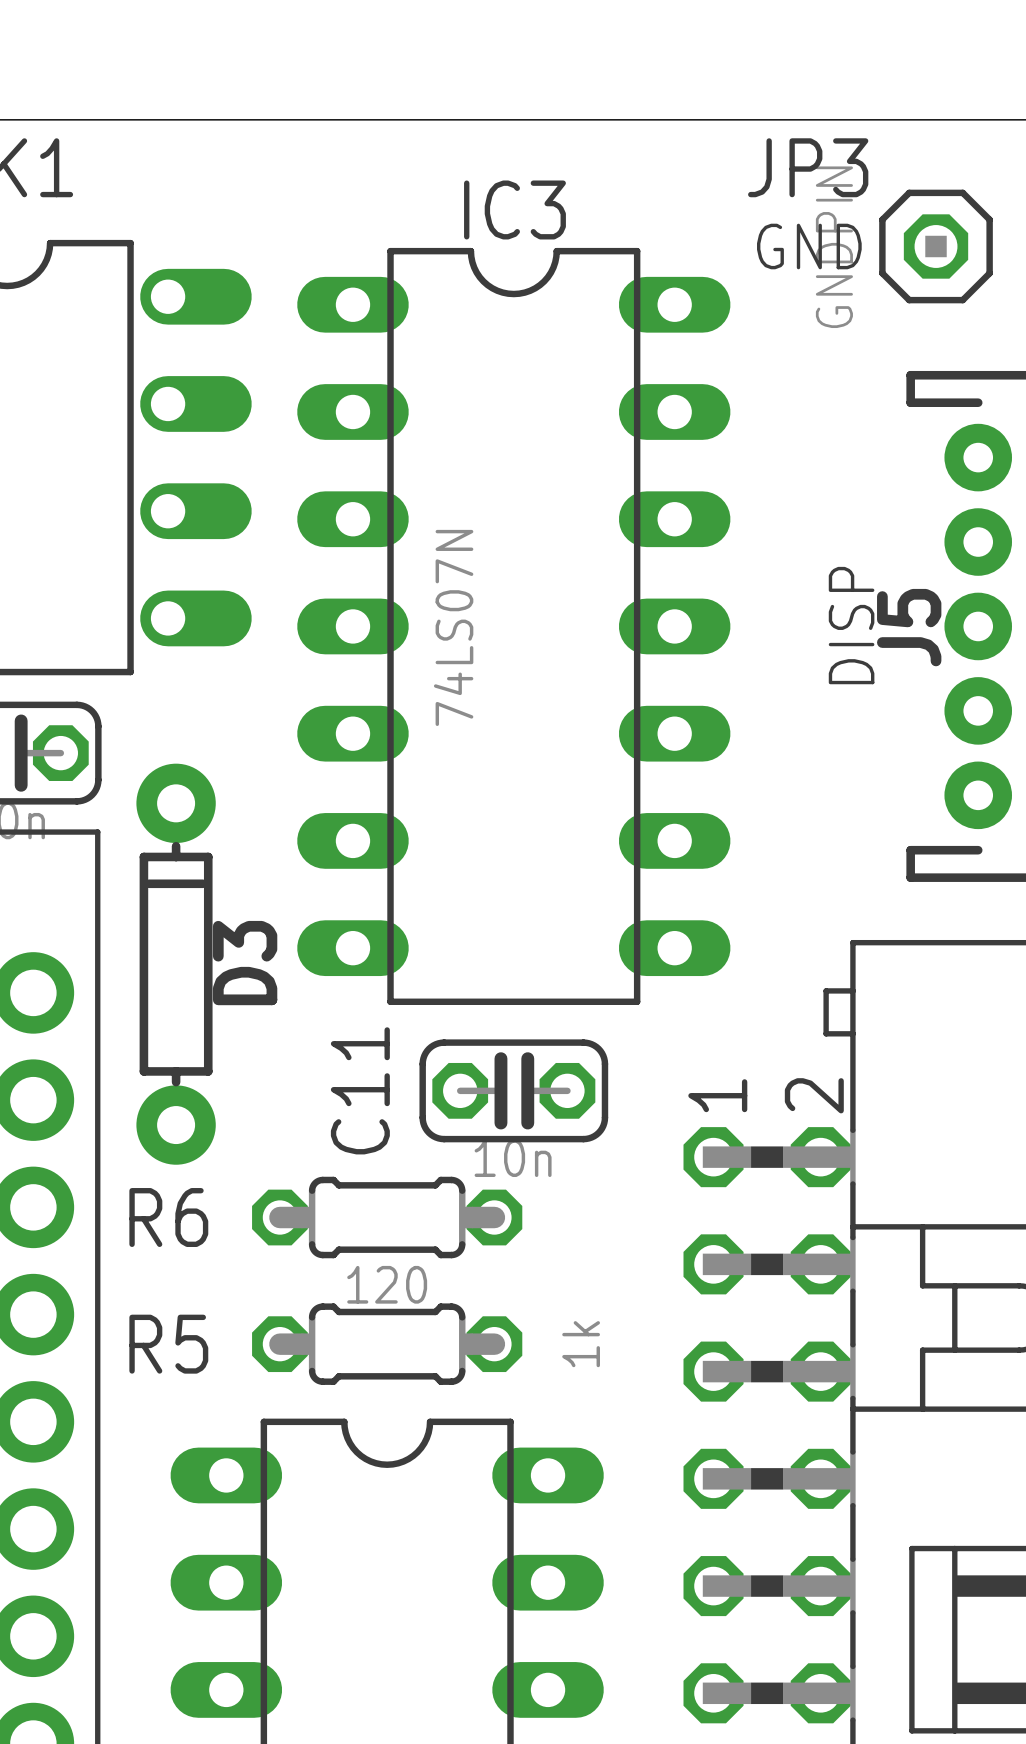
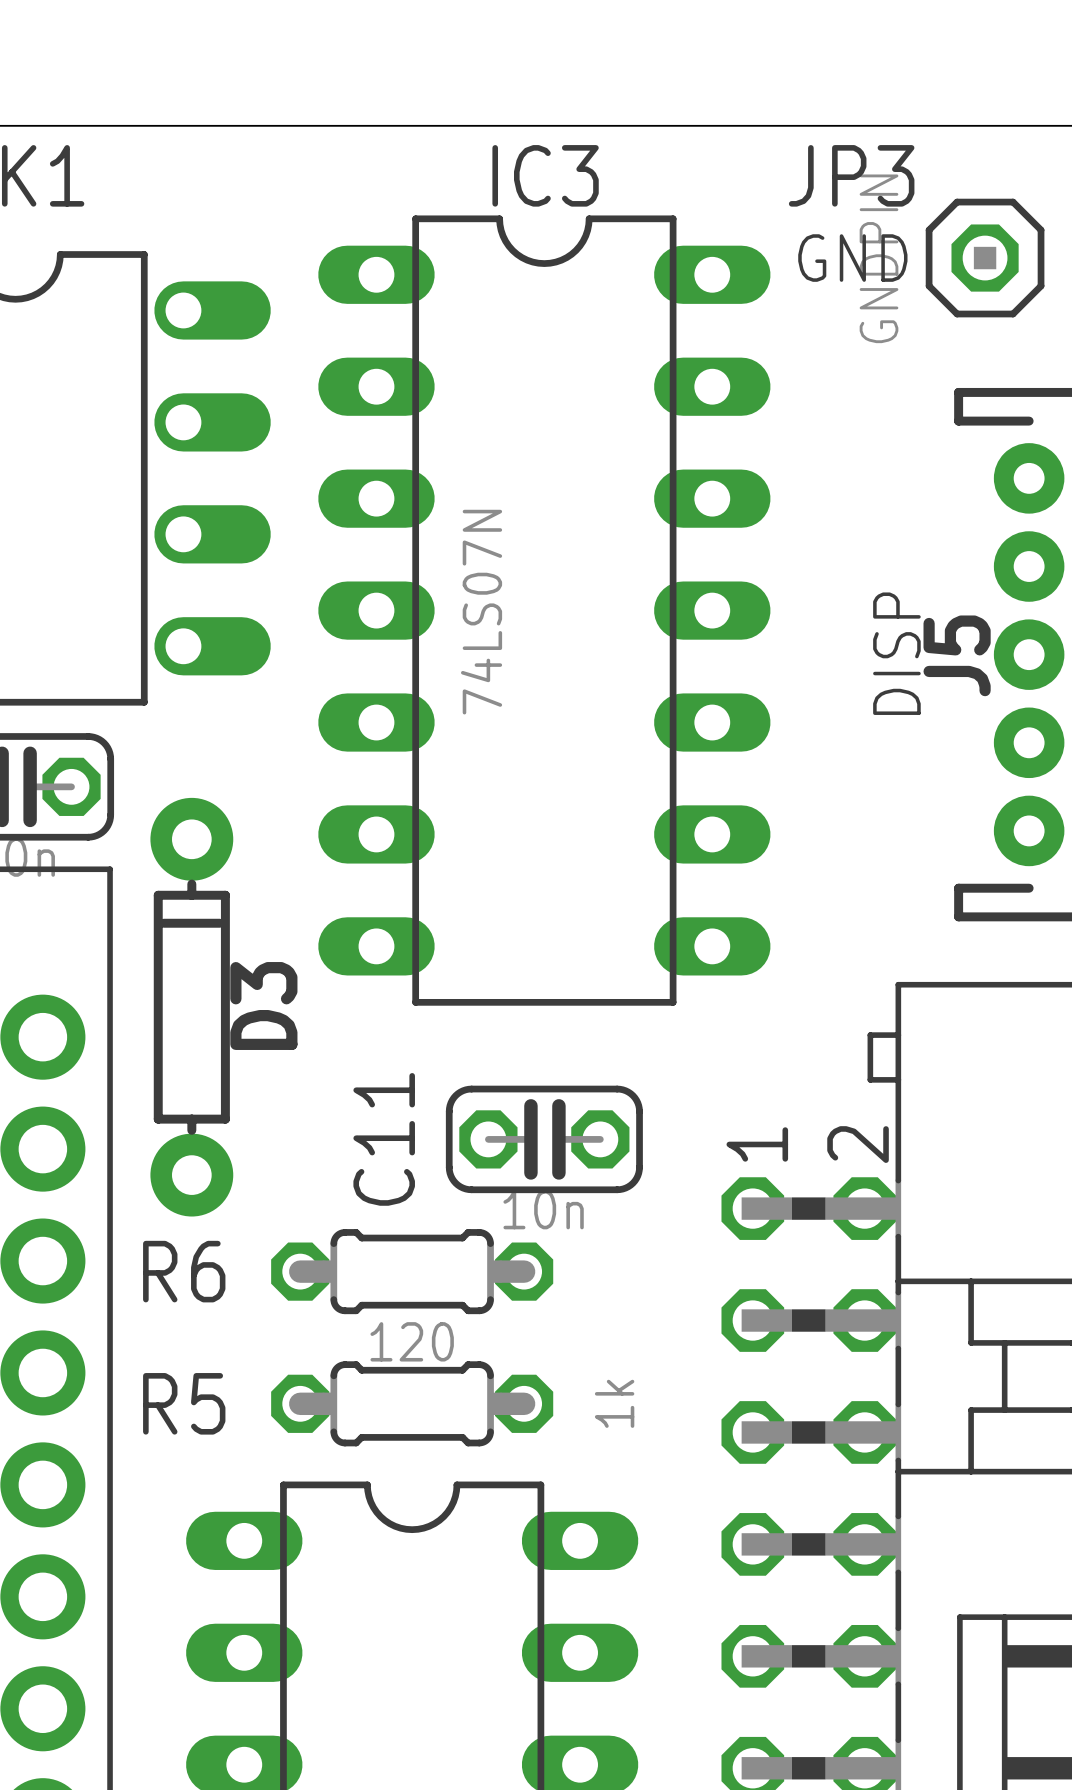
IC3 position: (513, 626) -> (544, 610)

